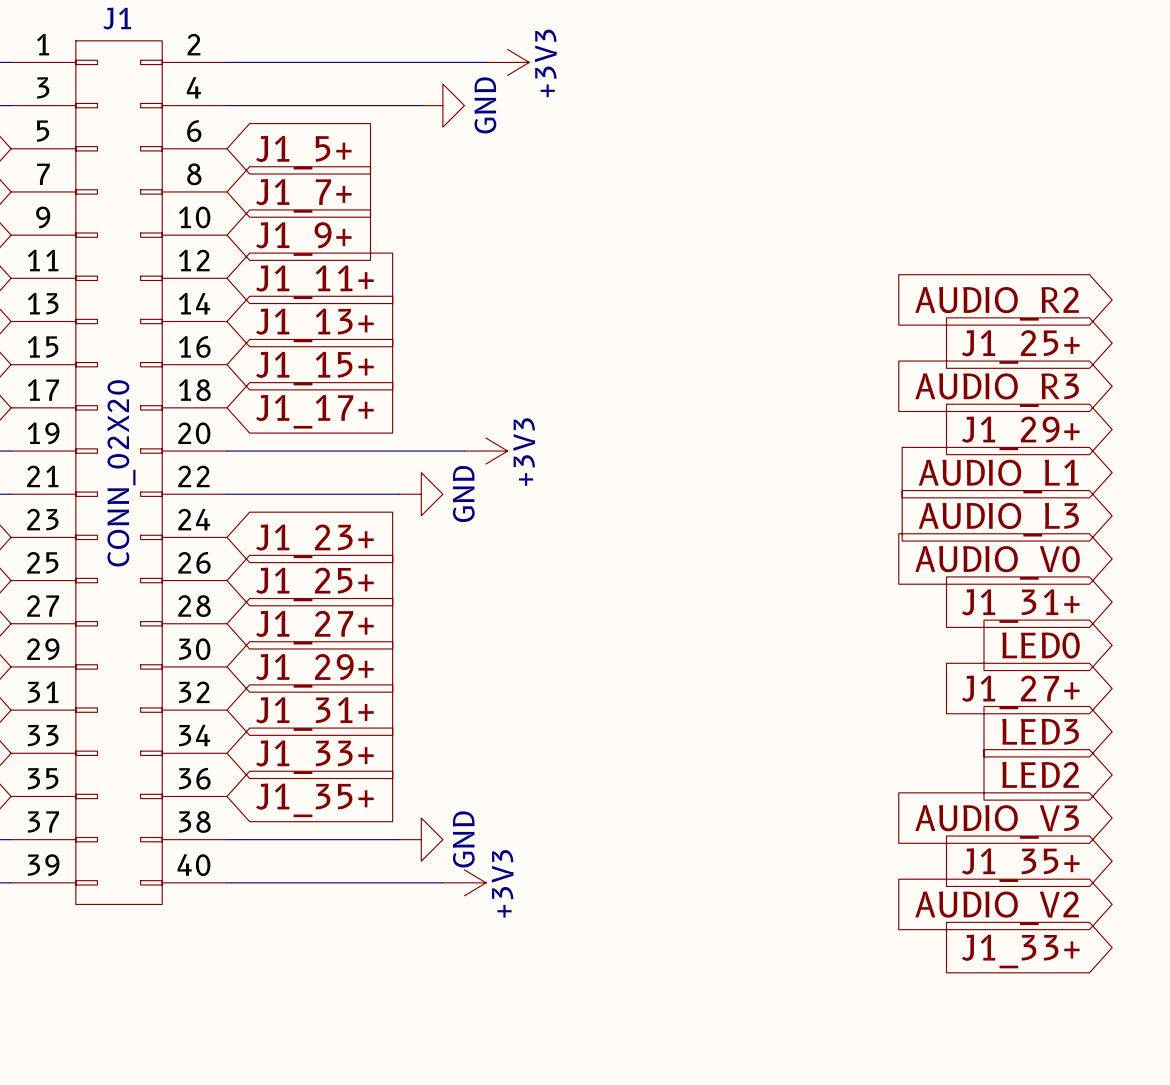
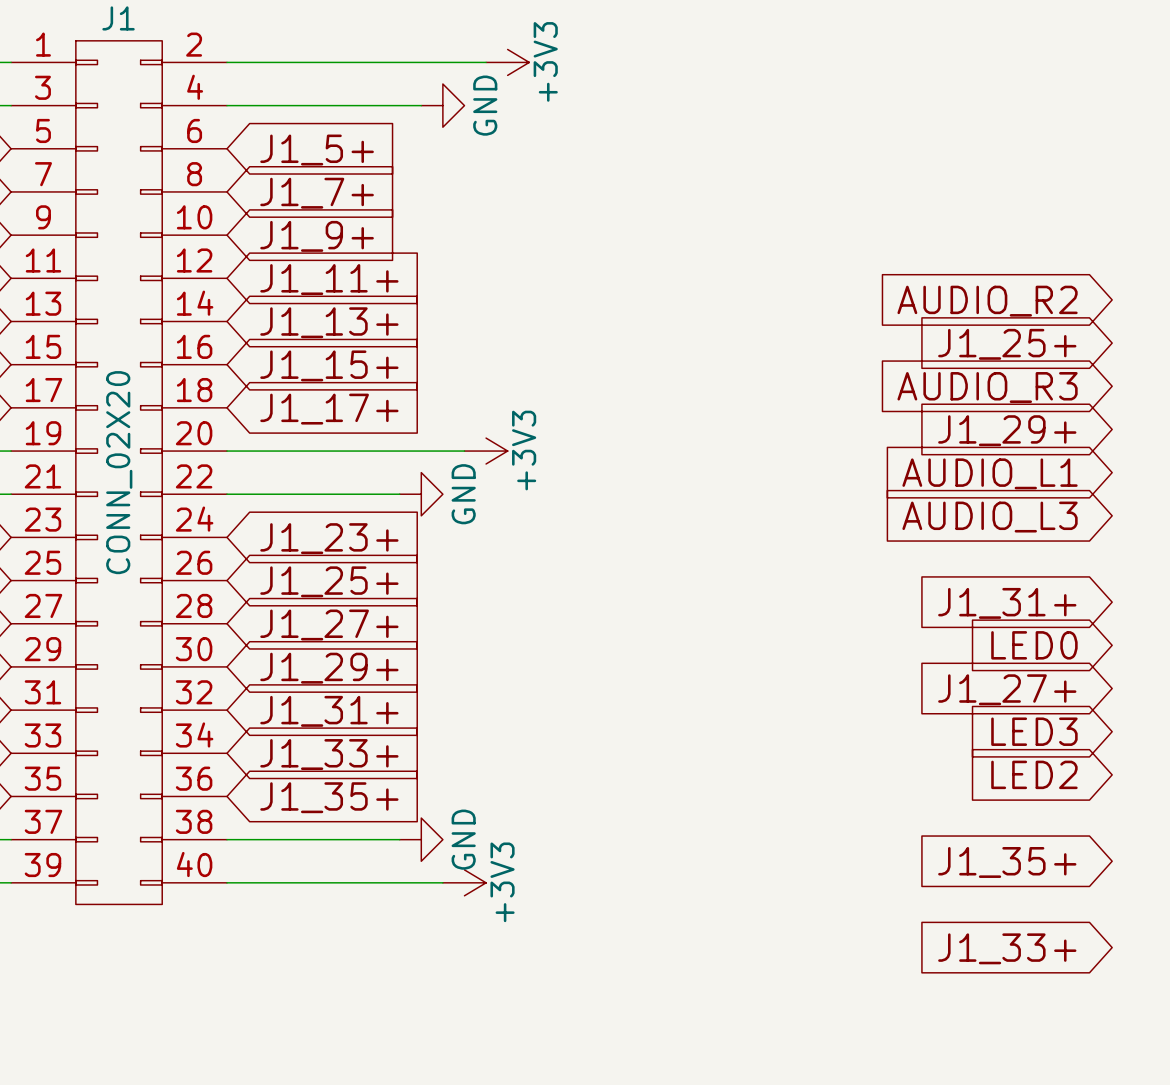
global label: AUDIO_V0 (997, 562) -> none
global label: AUDIO_V3 (997, 821) -> none
global label: AUDIO_V2 (997, 908) -> none

